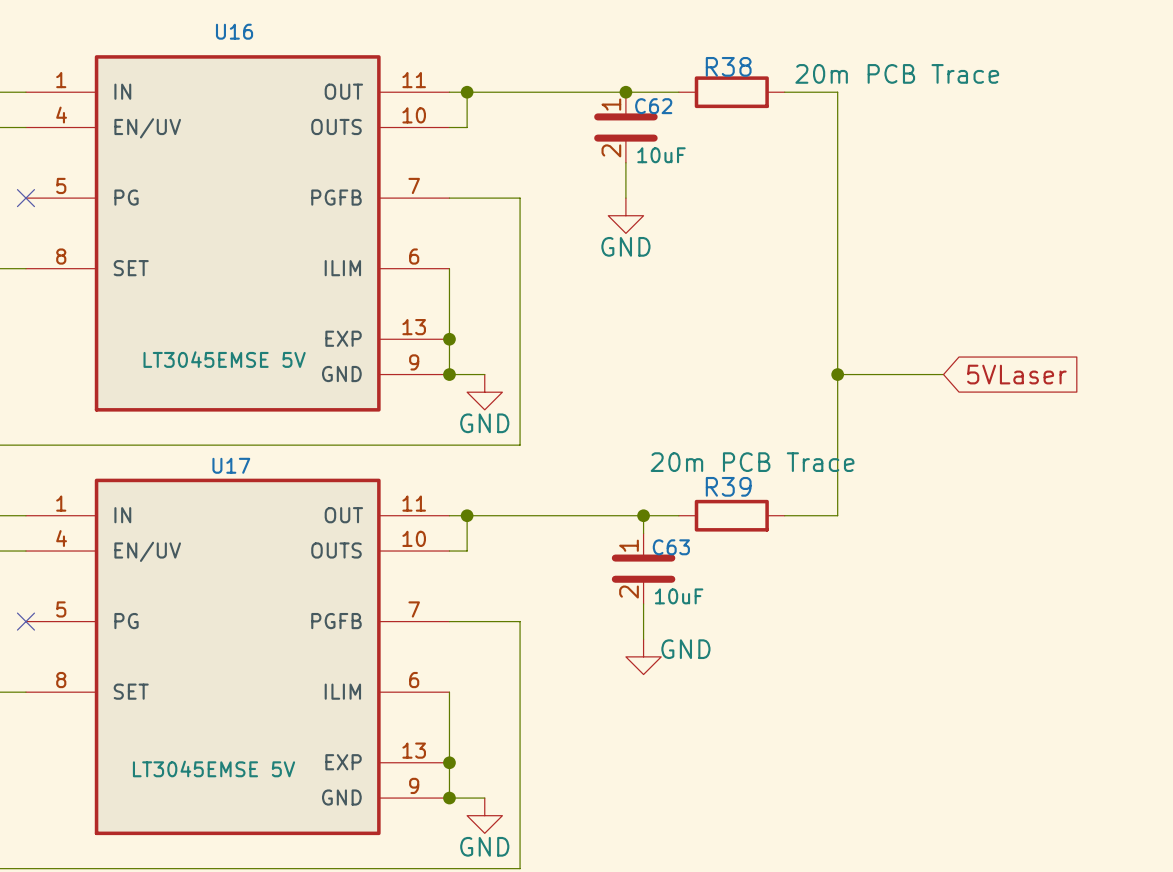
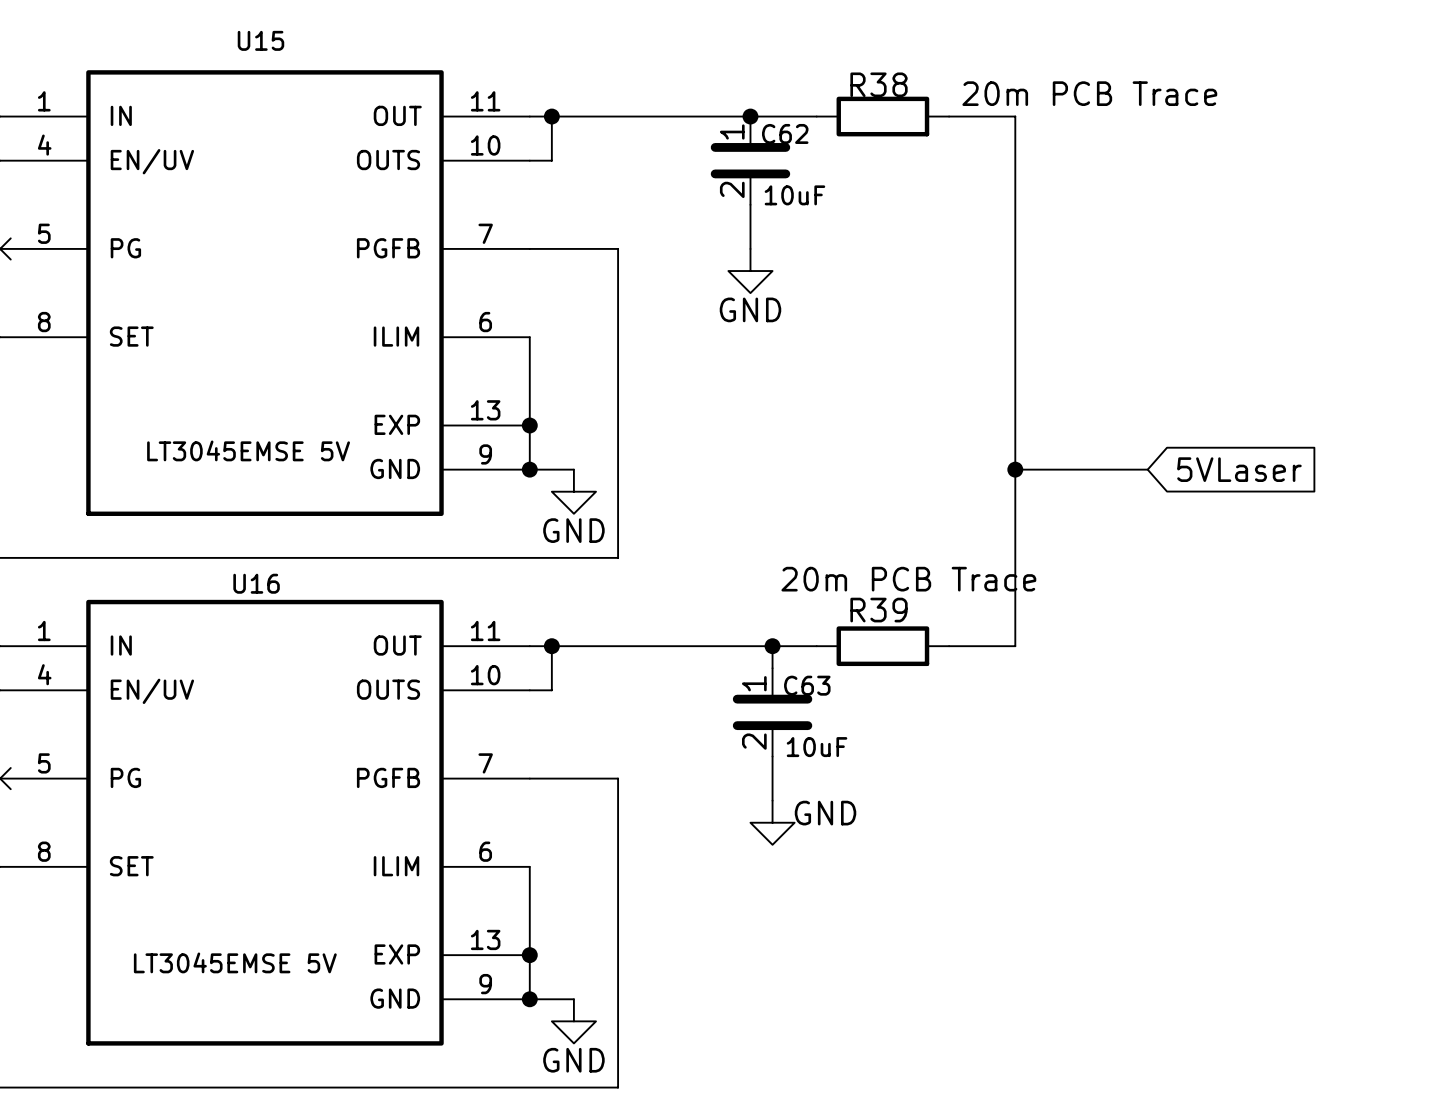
U16 name: U16 (234, 31) -> U15 (260, 40)
U17 name: U17 (231, 465) -> U16 (256, 583)

